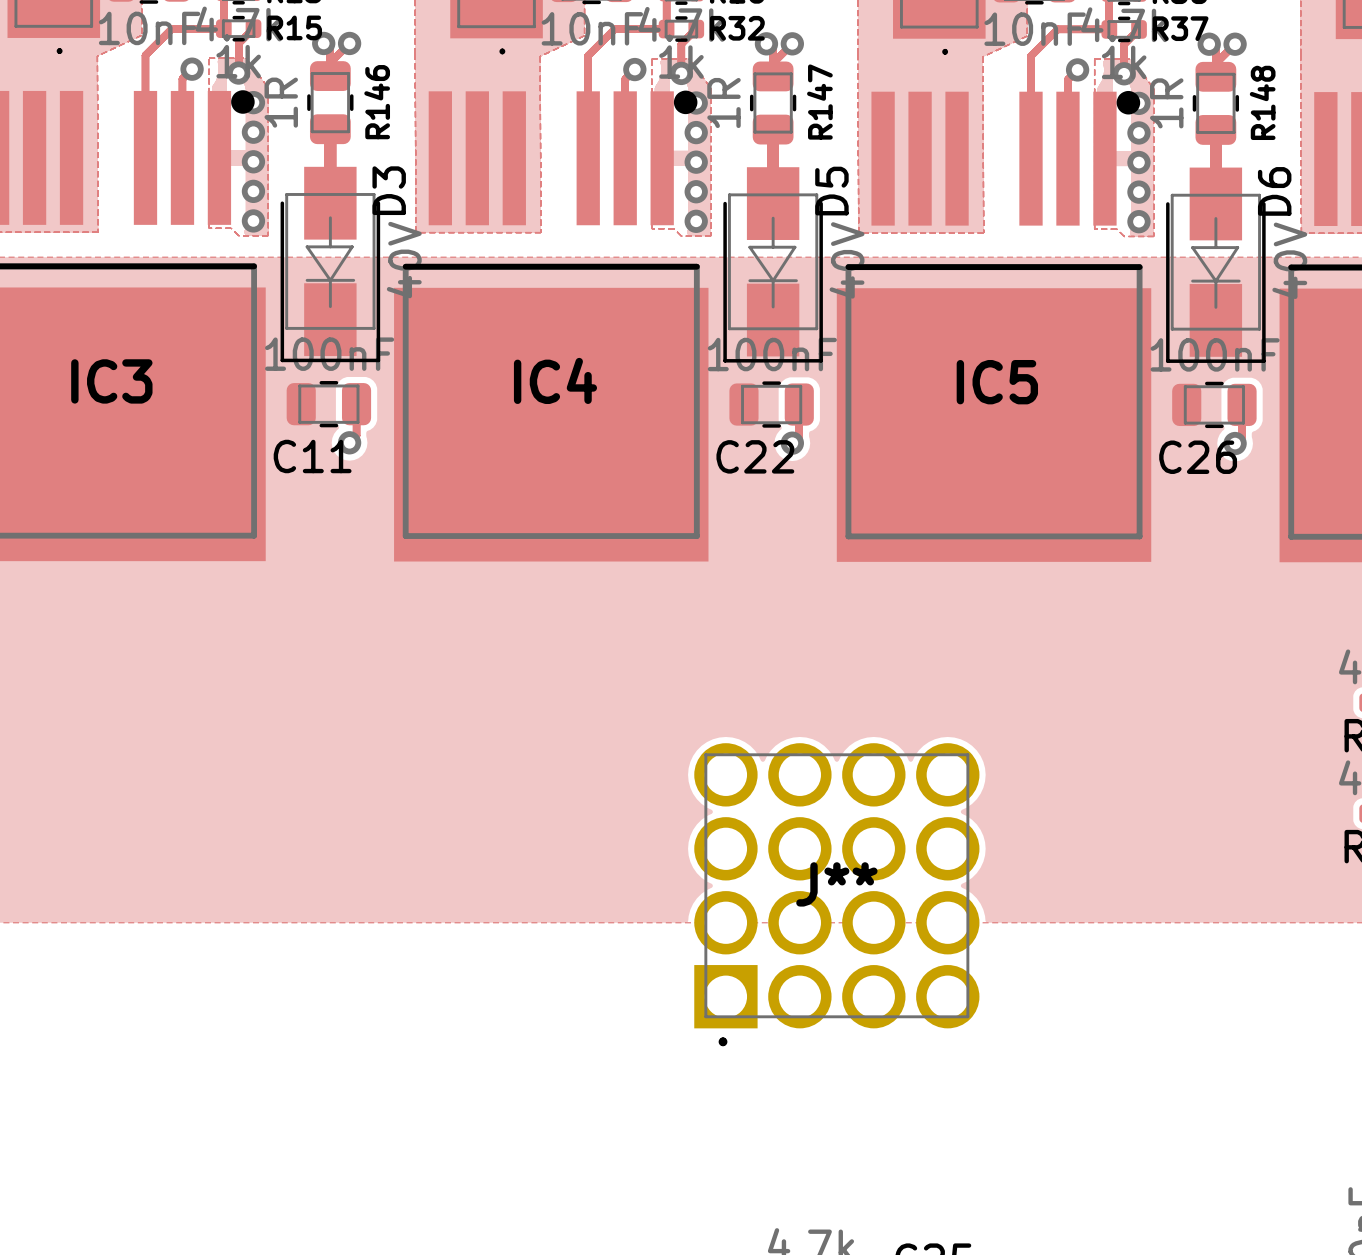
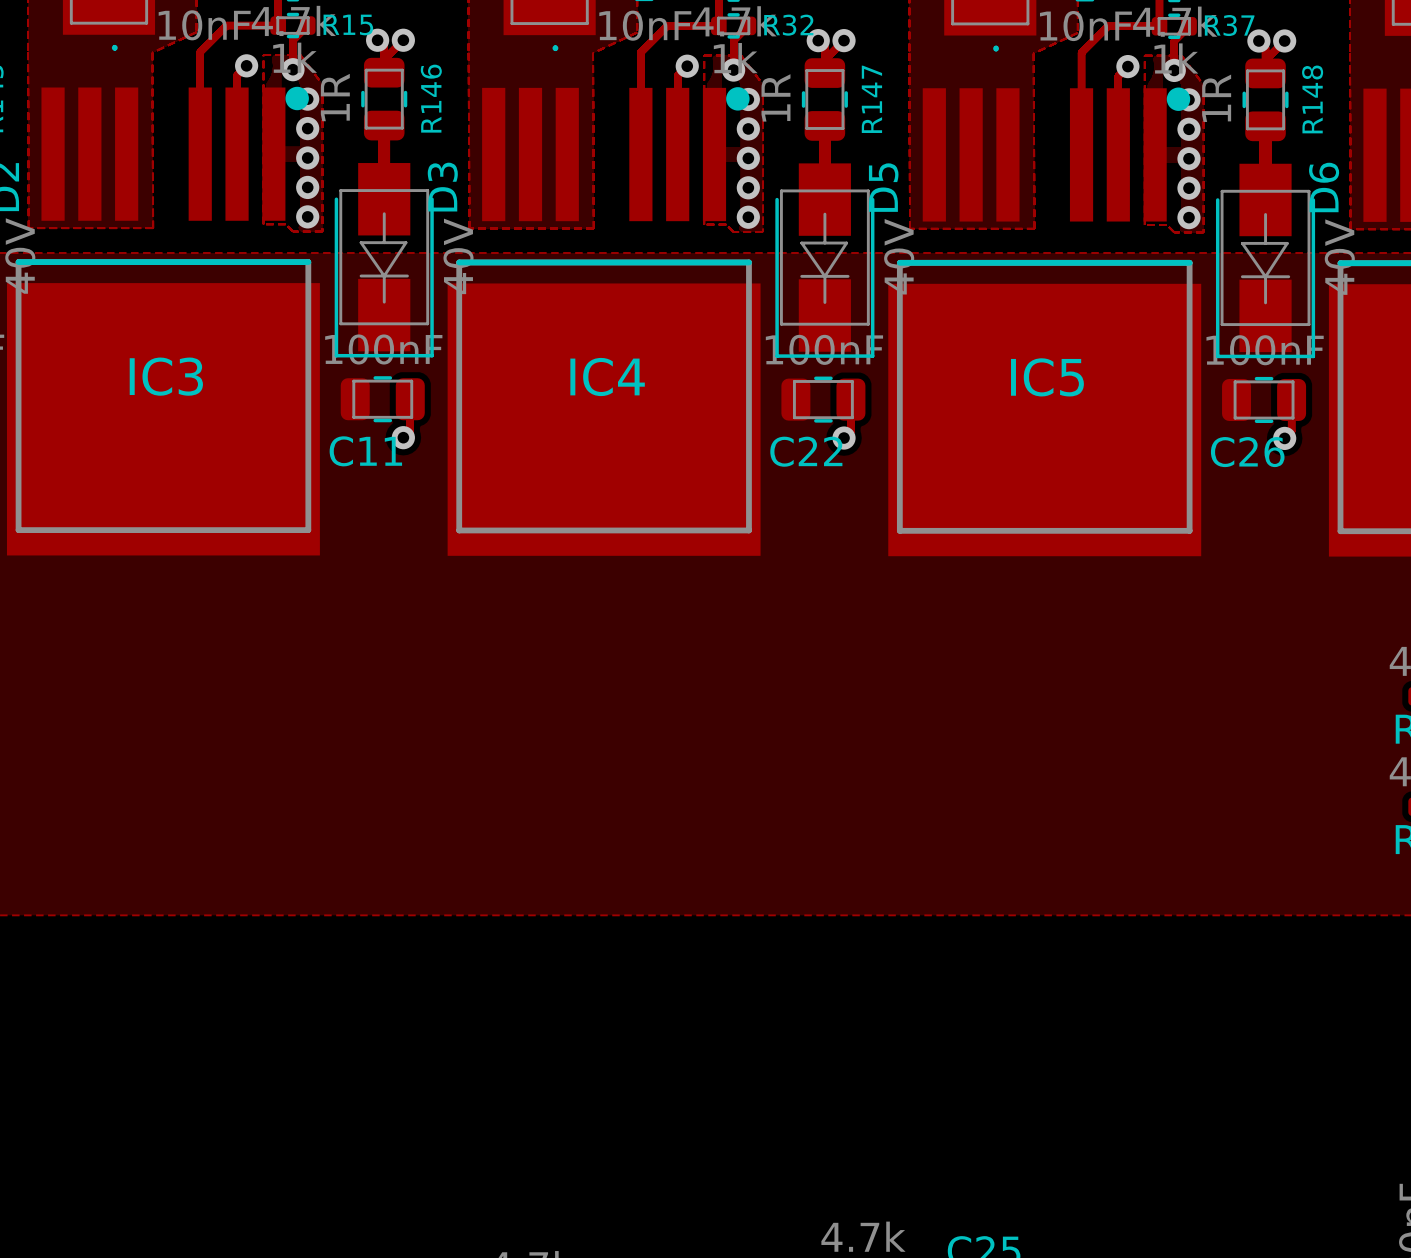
J**: (836, 894) -> none

